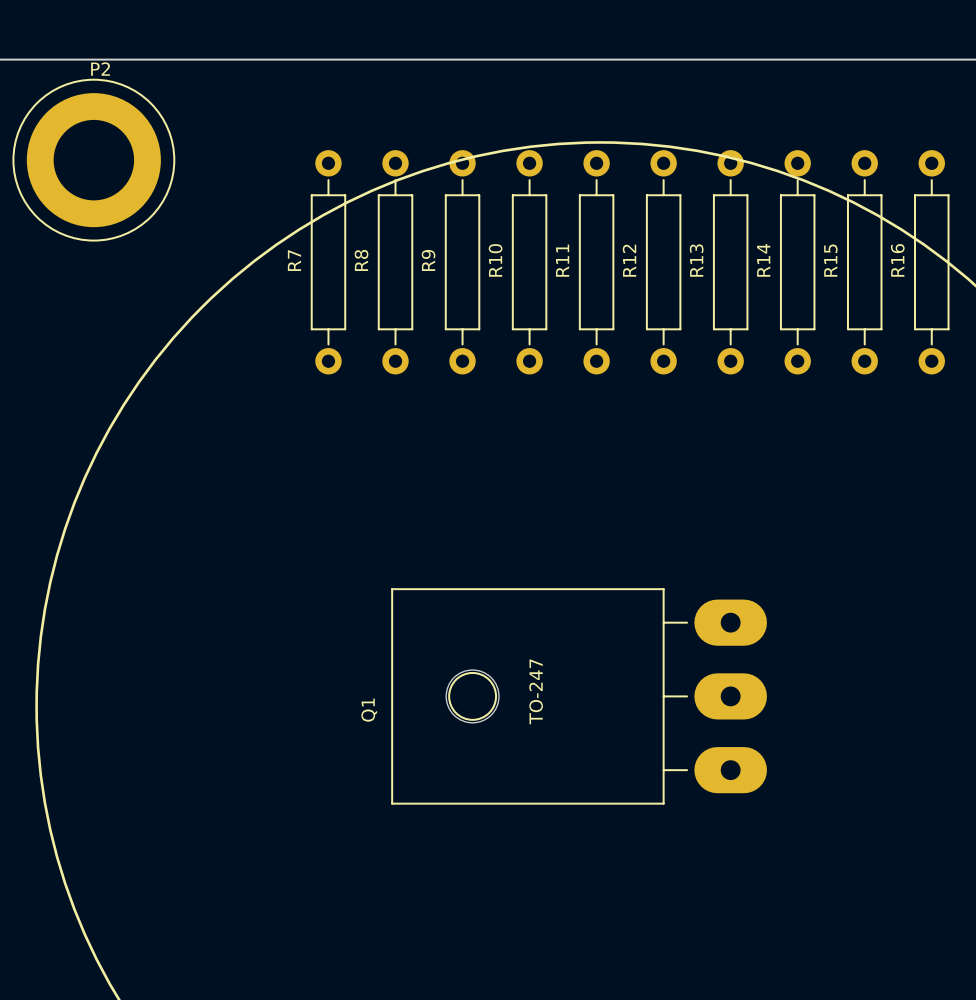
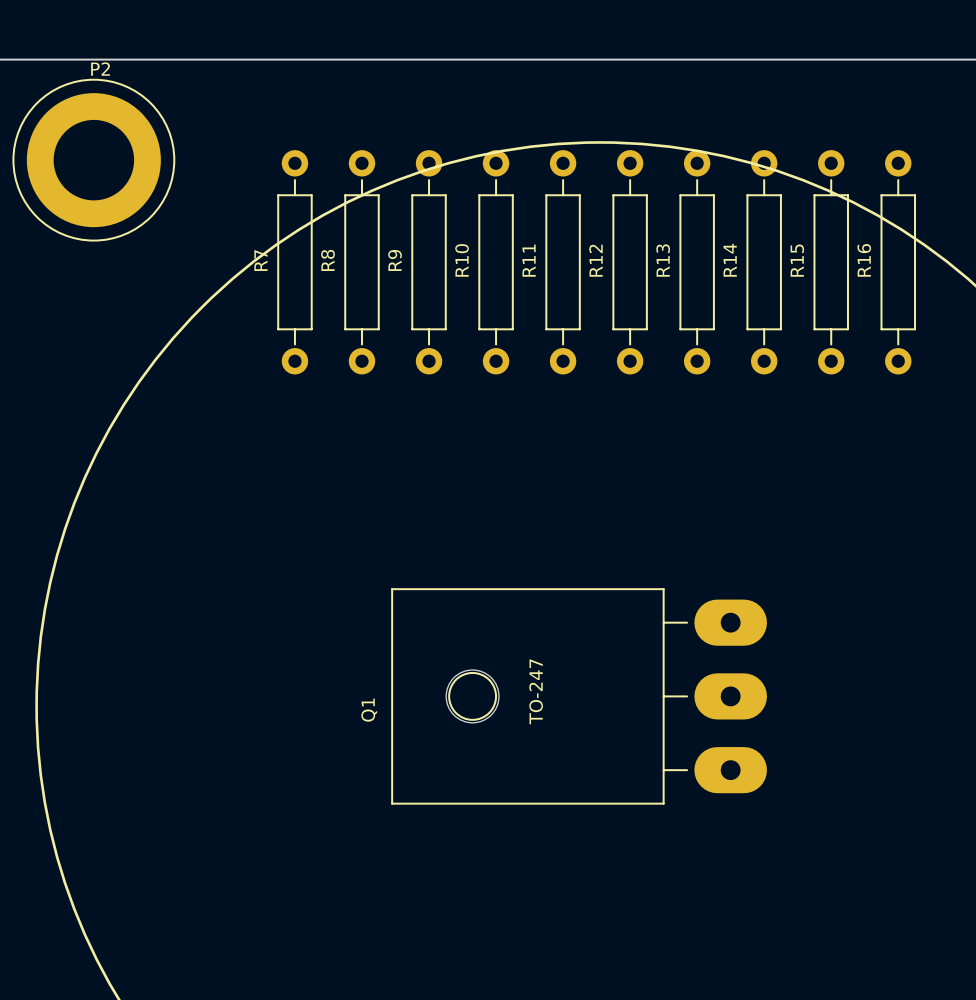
R7 position: (328, 262) -> (294, 262)
R8 position: (395, 262) -> (361, 262)
R9 position: (462, 262) -> (429, 262)
R10 position: (529, 262) -> (496, 262)
R11 position: (596, 262) -> (563, 262)
R12 position: (663, 262) -> (630, 262)
R13 position: (730, 262) -> (697, 262)
R14 position: (797, 262) -> (764, 262)
R15 position: (864, 262) -> (831, 262)
R16 position: (931, 262) -> (898, 262)

